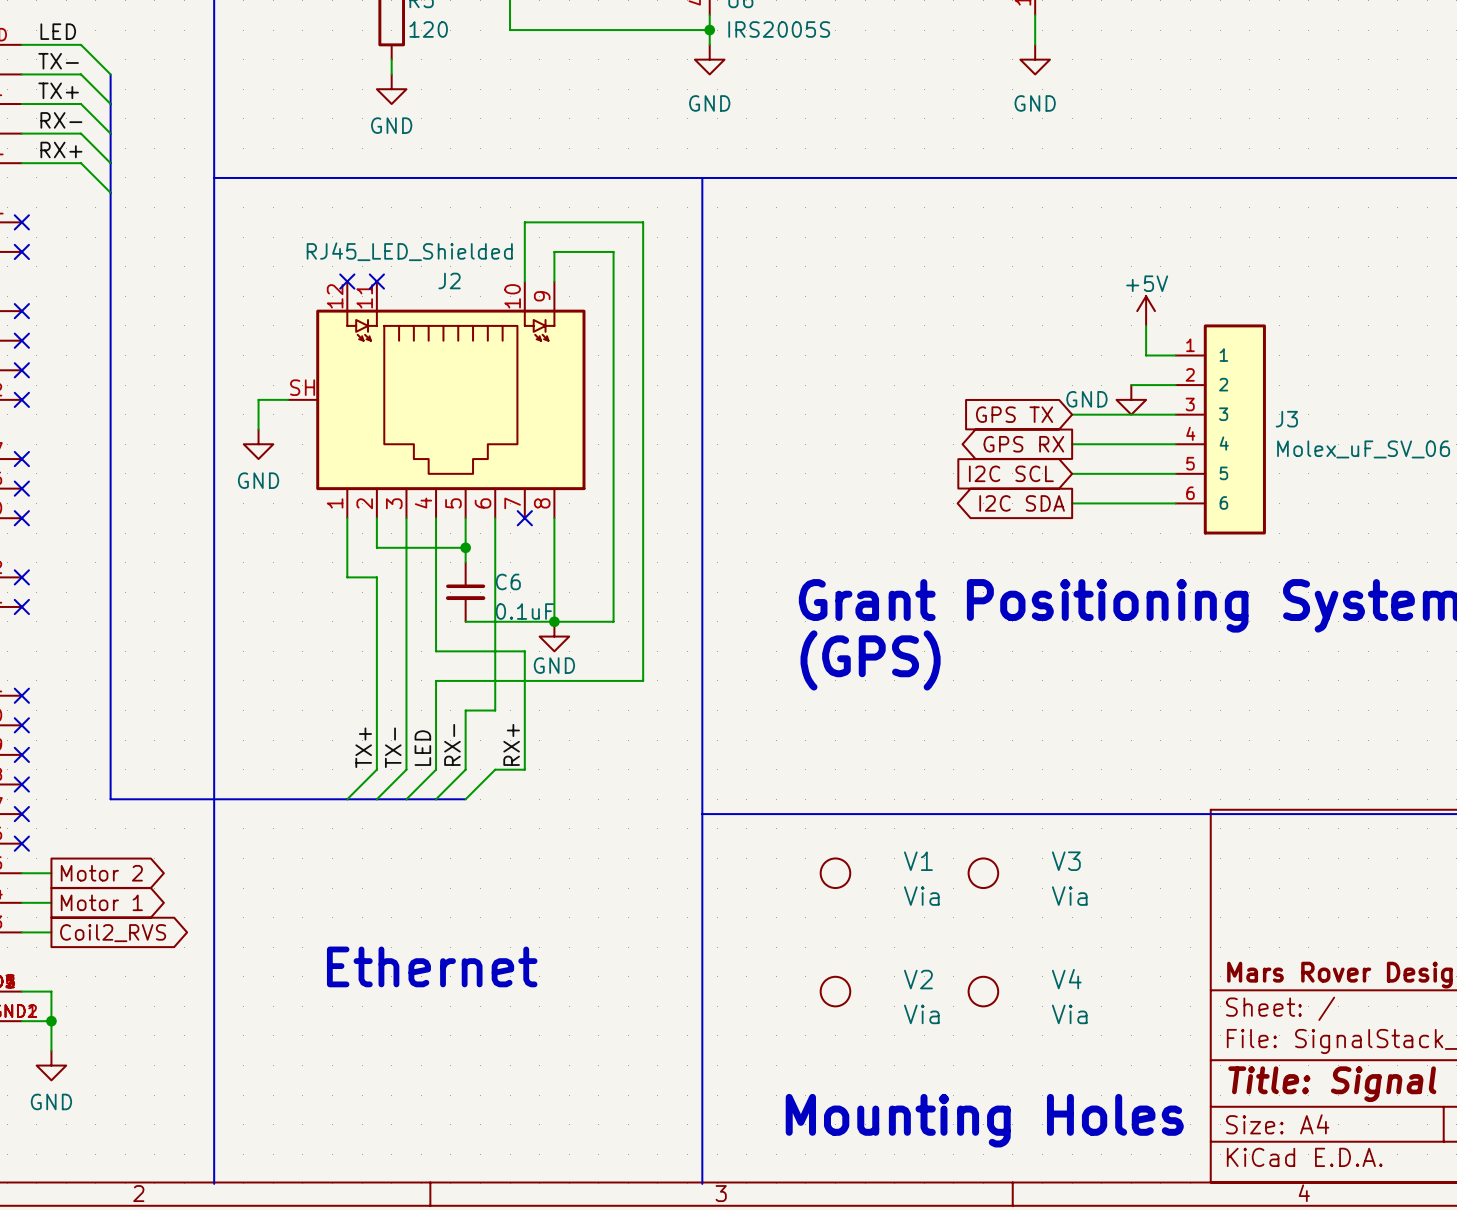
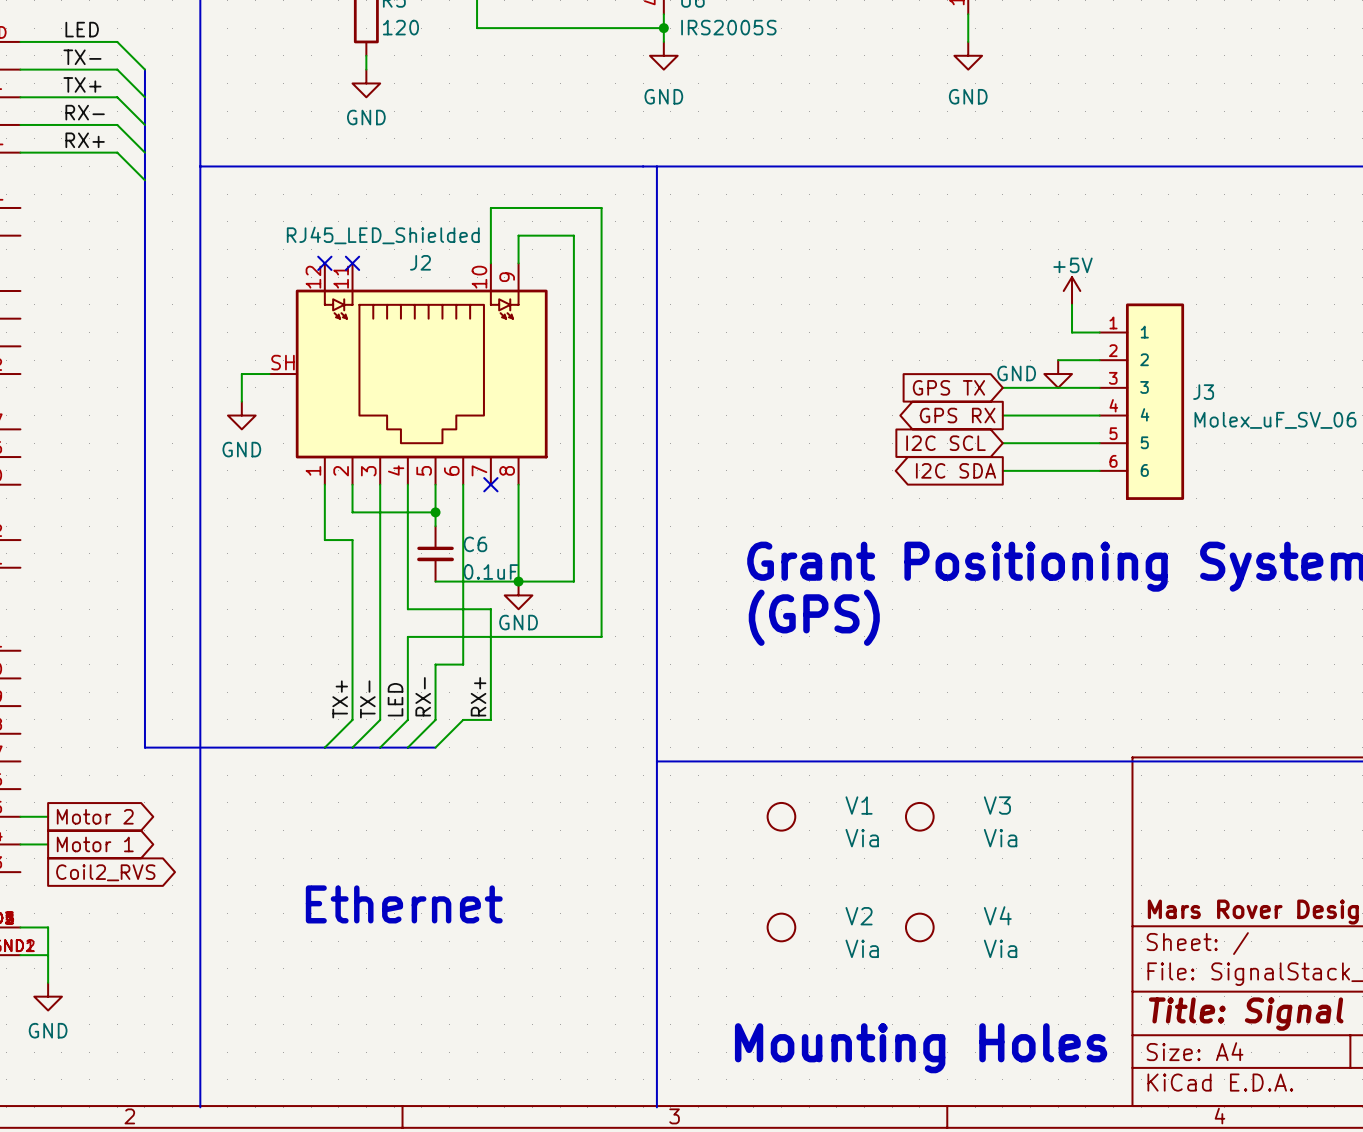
label position: LED (58, 31) -> LED (82, 29)
wire: (81, 44) (110, 74) -> (75, 41) (117, 41) (144, 69)
label position: TX- (58, 61) -> TX- (82, 57)
wire: (81, 74) (110, 104) -> (75, 69) (117, 69) (144, 97)
bus: (110, 74) (110, 799) (154, 799) -> (144, 69) (144, 747)
label position: TX+ (58, 90) -> TX+ (82, 84)
wire: (81, 104) (110, 133) -> (75, 97) (117, 97) (144, 124)
label position: RX- (61, 120) -> RX- (85, 112)
wire: (81, 133) (110, 163) -> (75, 124) (117, 124) (144, 152)
label position: RX+ (61, 149) -> RX+ (85, 140)
wire: (81, 163) (110, 192) -> (75, 152) (117, 152) (144, 180)
no-connect mark: (21, 222) -> none
no-connect mark: (21, 251) -> none
no-connect mark: (21, 311) -> none
no-connect mark: (21, 340) -> none
no-connect mark: (21, 370) -> none
no-connect mark: (21, 399) -> none
no-connect mark: (21, 459) -> none
no-connect mark: (21, 488) -> none
no-connect mark: (21, 518) -> none
no-connect mark: (21, 577) -> none
no-connect mark: (21, 606) -> none
no-connect mark: (21, 695) -> none
no-connect mark: (21, 725) -> none
no-connect mark: (21, 754) -> none
no-connect mark: (21, 784) -> none
no-connect mark: (21, 814) -> none
no-connect mark: (21, 843) -> none
wire: (21, 932) (51, 932) -> none
junction: (51, 1021) -> none

